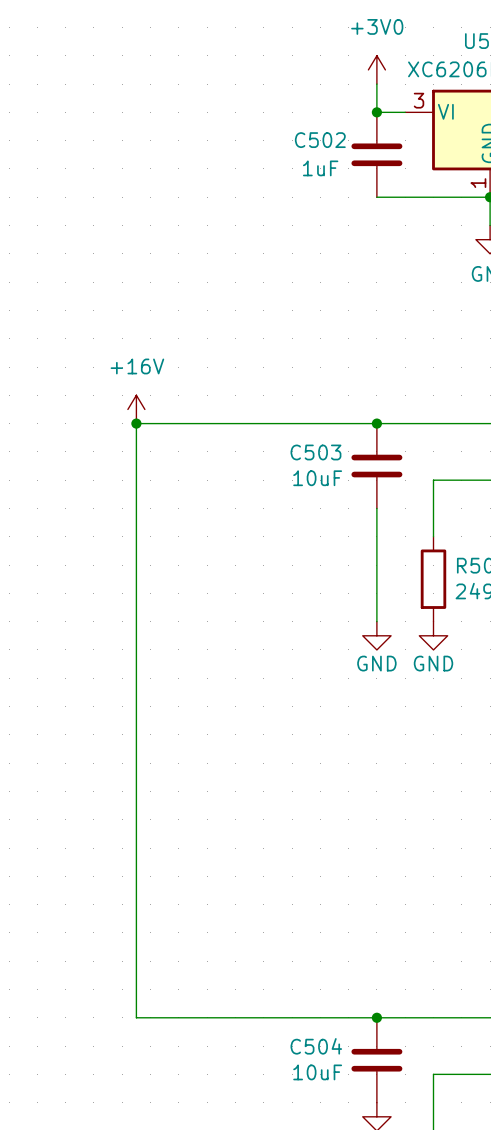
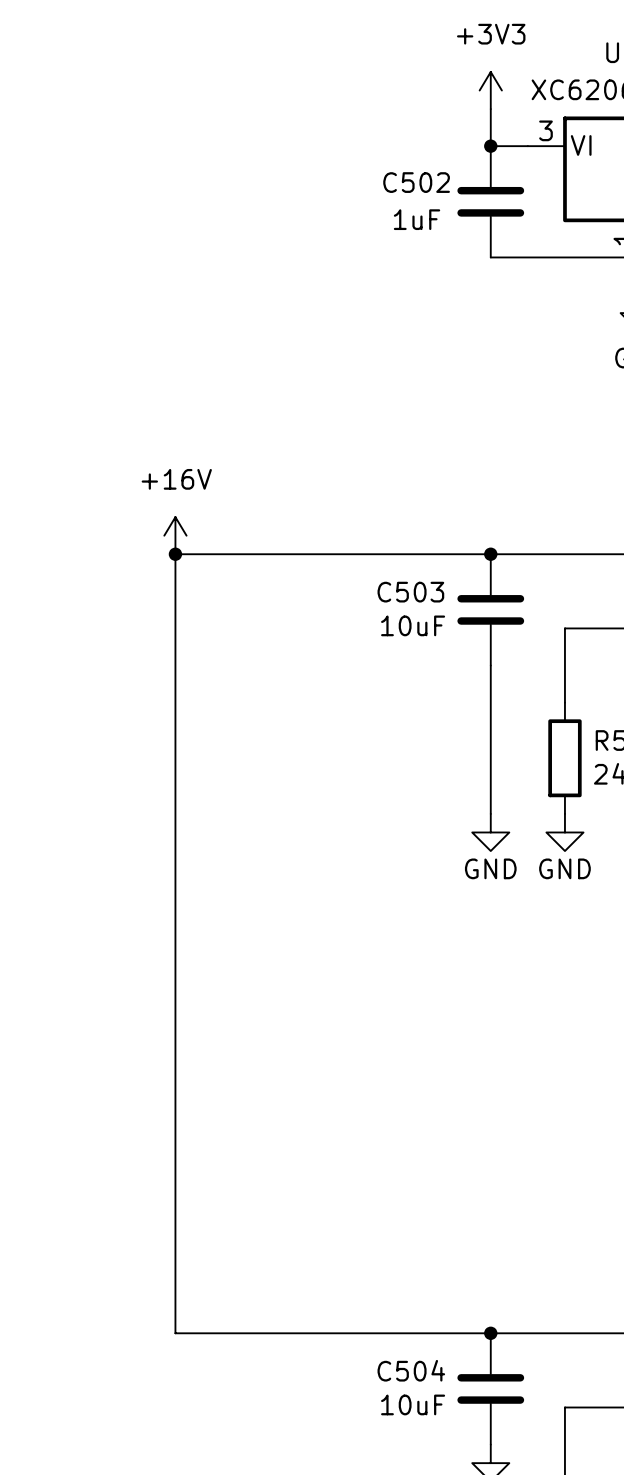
power symbol: +3V0 (376, 69) -> +3V3 (490, 90)

